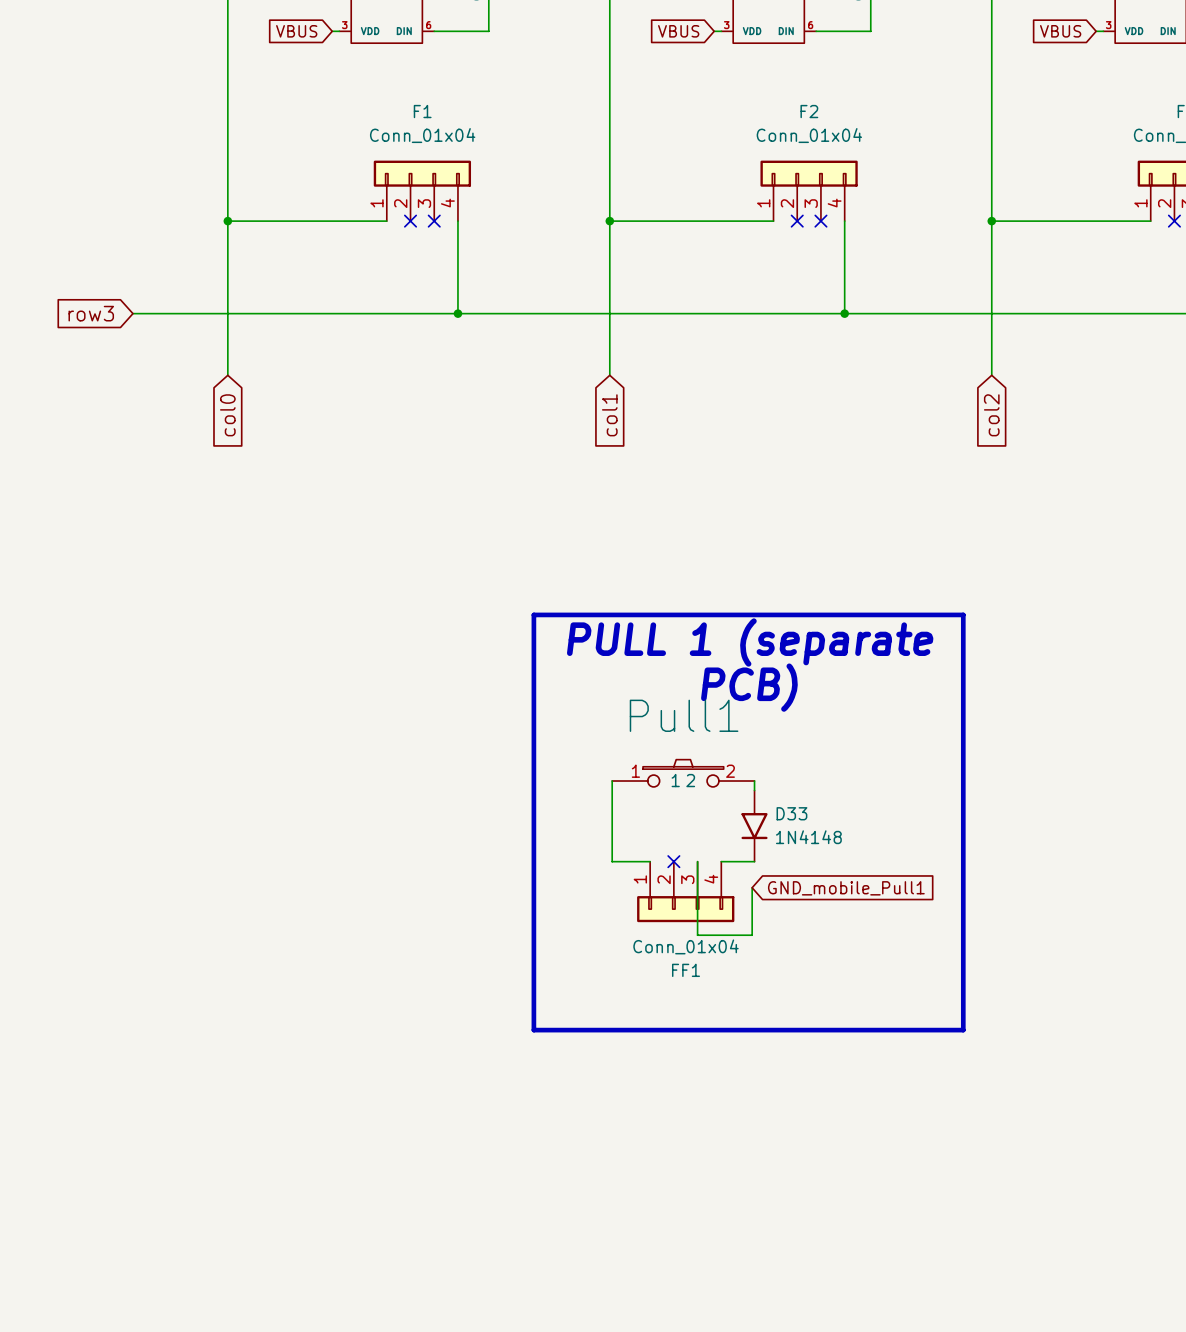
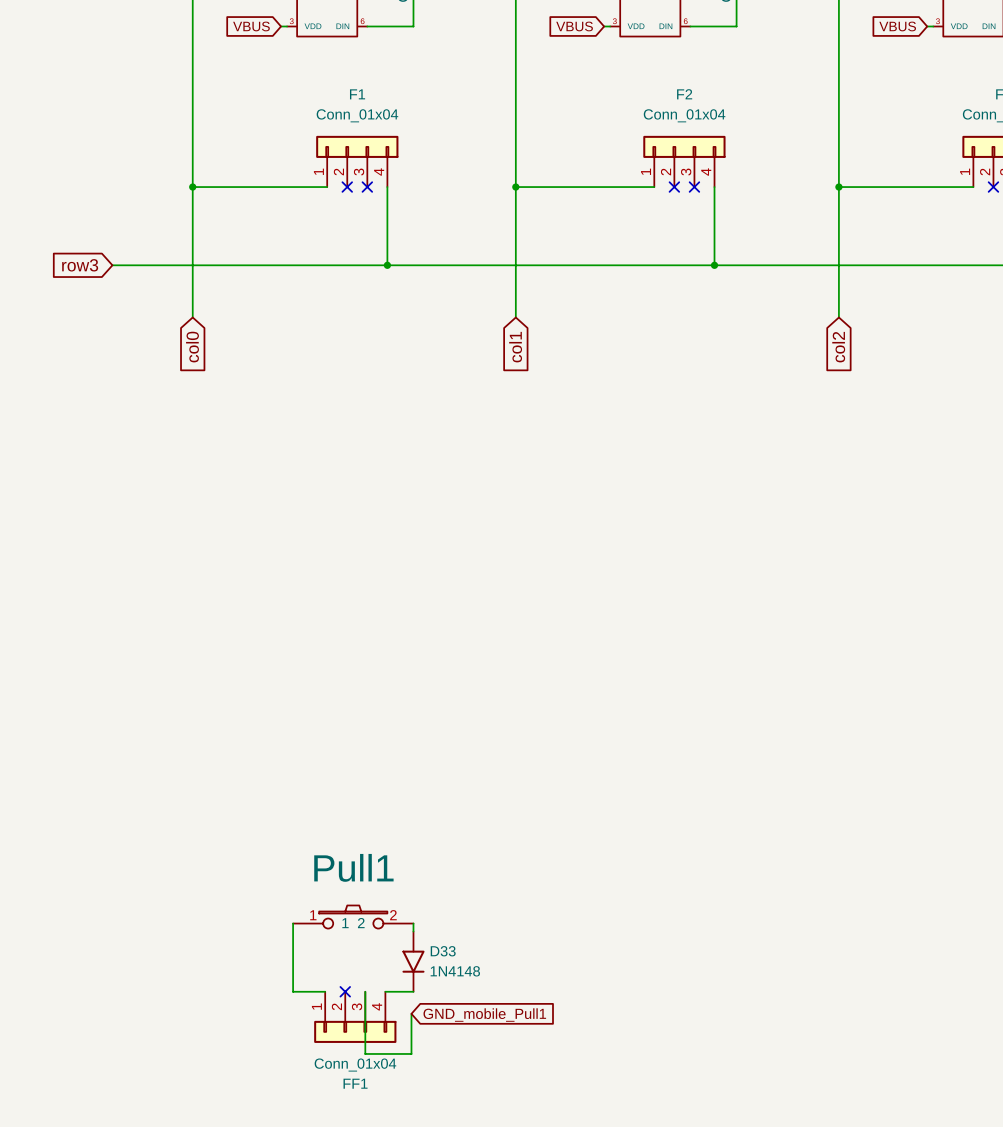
line: (533, 614) (963, 614) (963, 1030) (533, 1030) (533, 614) -> none
text: PULL 1 (separate (750, 642) -> none
text: PCB) (749, 687) -> none
Pull1 position: (683, 773) -> (353, 917)
wire: (612, 781) (612, 861) (650, 861) -> none
wire: (754, 781) (754, 790) -> none
D33 position: (754, 826) -> (413, 961)
no-connect mark: (673, 861) -> none
wire: (697, 861) (697, 935) (752, 935) (752, 887) -> none
wire: (721, 861) (754, 861) -> none
global label: GND_mobile_Pull1 (846, 888) -> none
FF1 position: (685, 891) -> (355, 1017)
wire: none -> (293, 923) (293, 991) (325, 991)
wire: none -> (413, 923) (413, 931)
no-connect mark: none -> (345, 991)
wire: none -> (365, 991) (365, 1053) (411, 1053) (411, 1013)
wire: none -> (385, 991) (413, 991)
global label: none -> GND_mobile_Pull1 (484, 1015)

